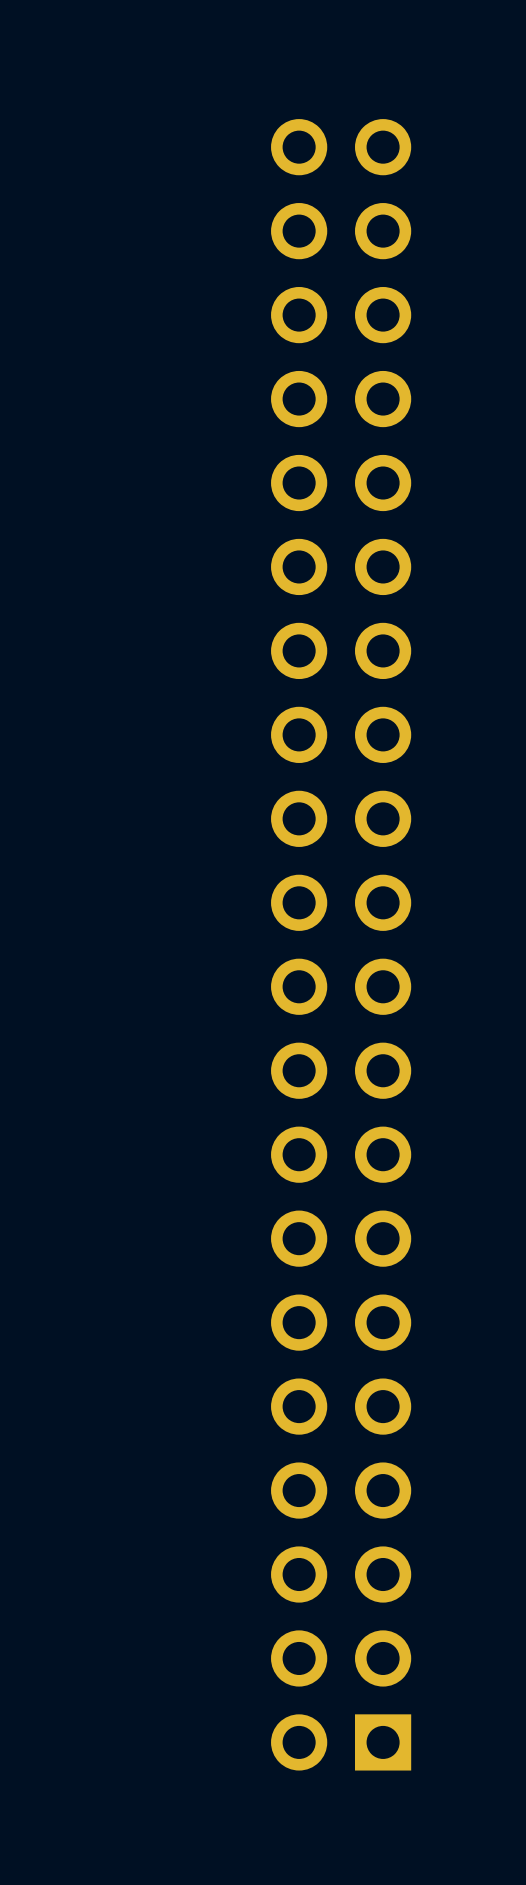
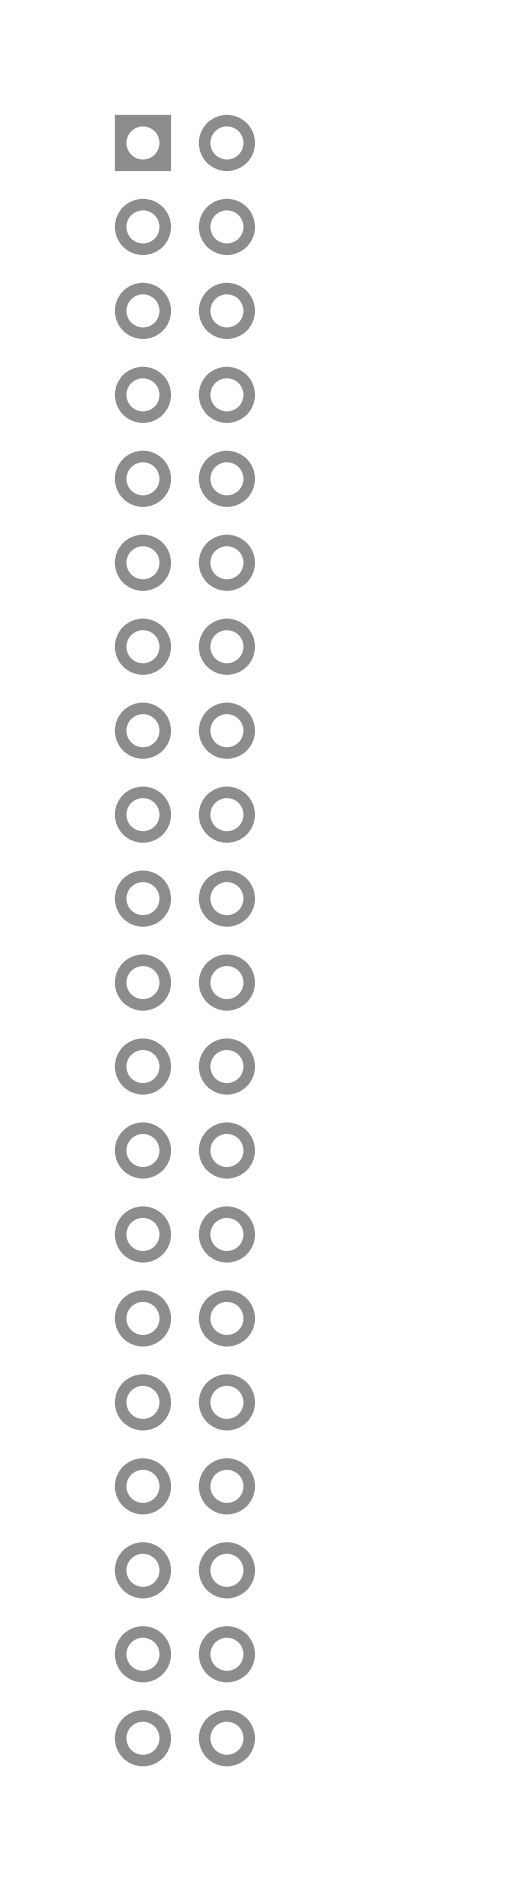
part rotation: 0° (341, 944) -> 180° (184, 940)

